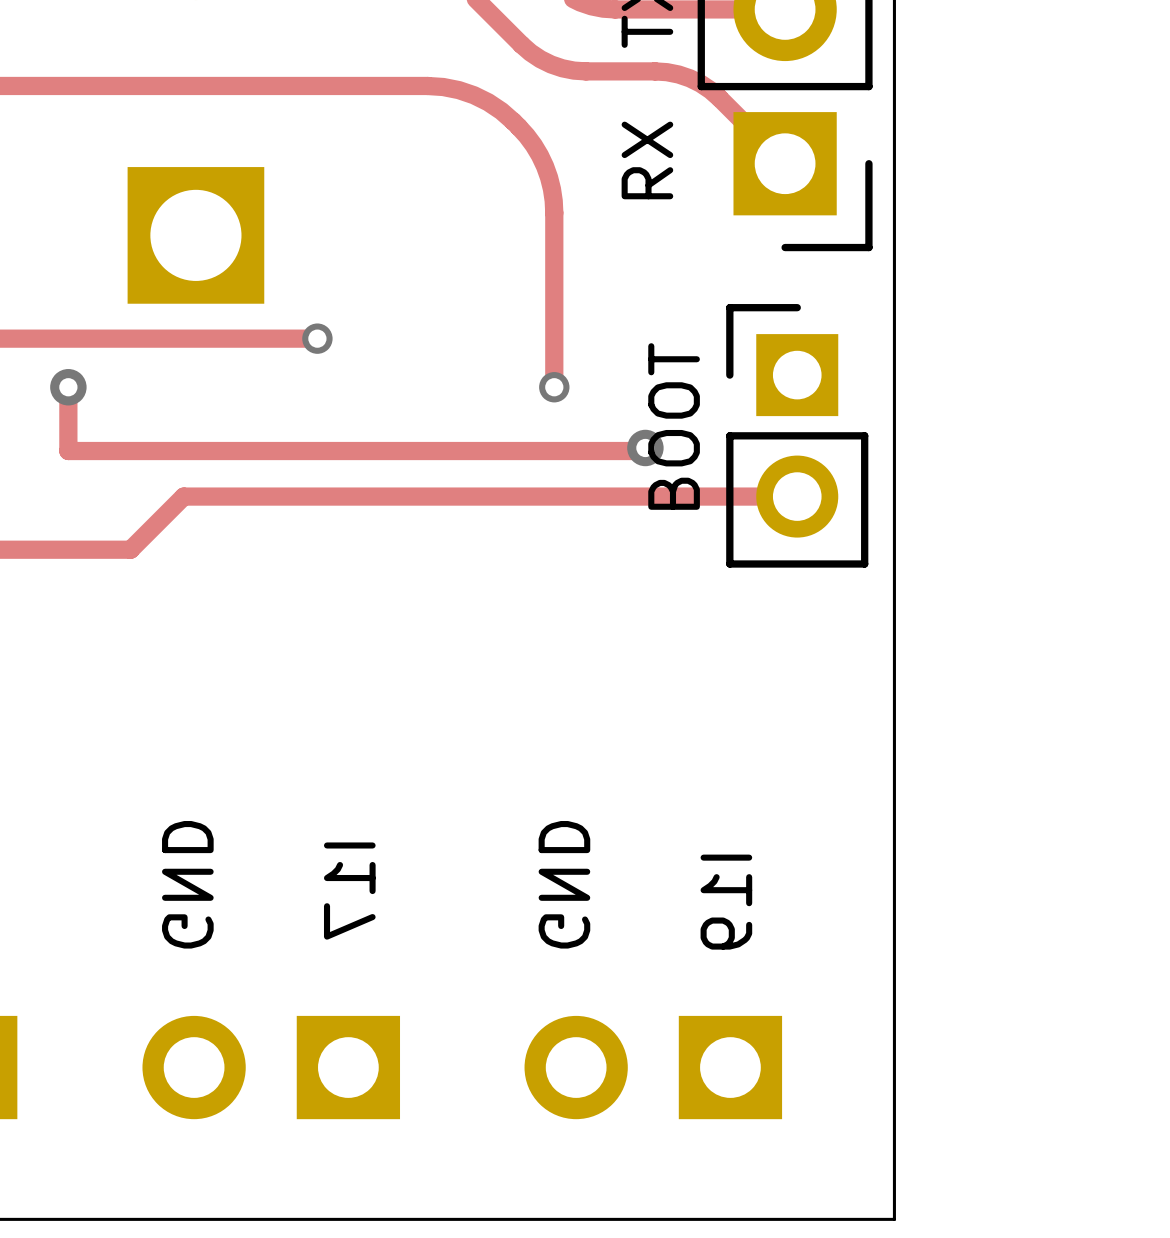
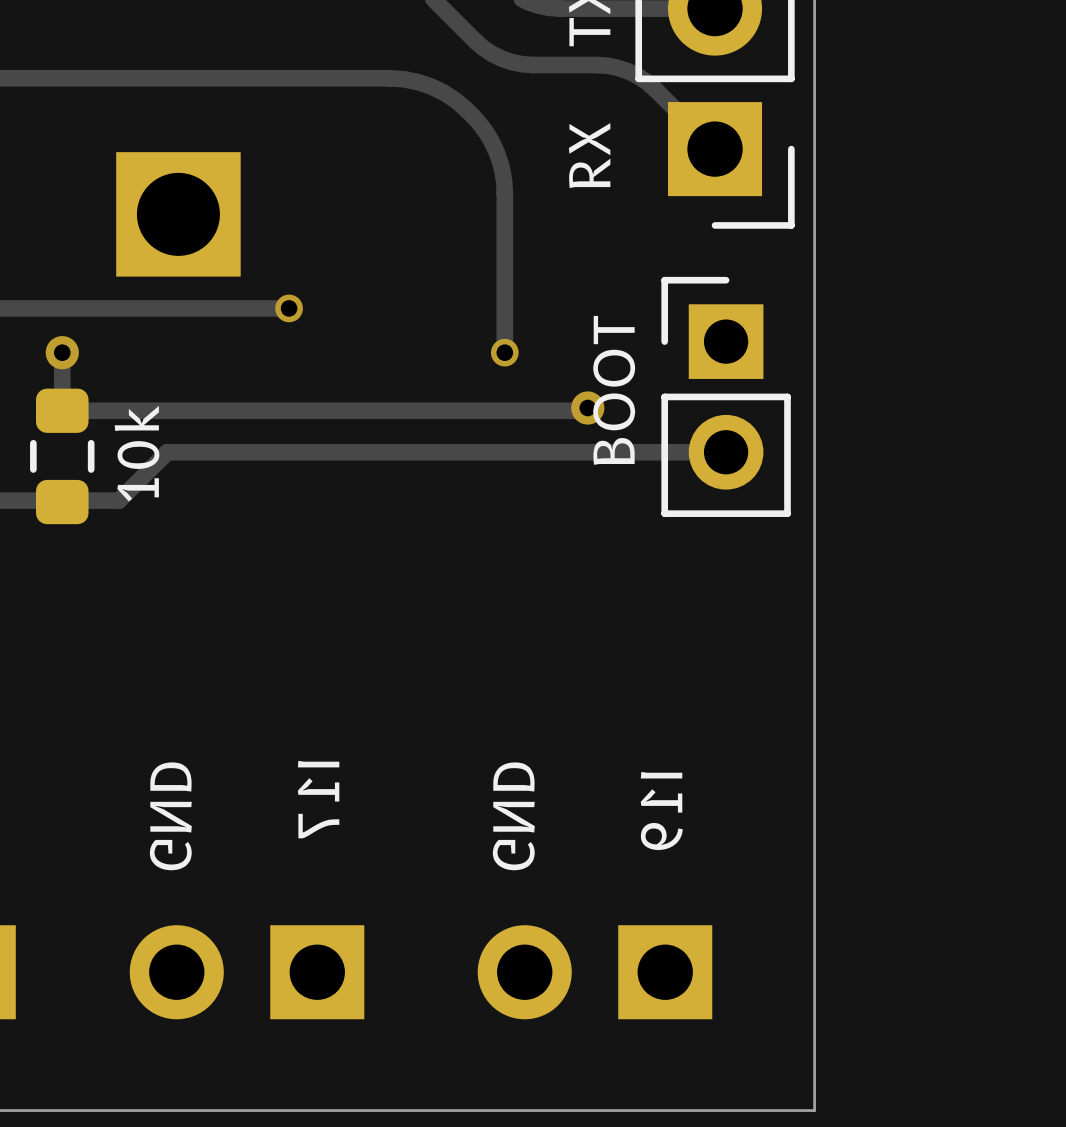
part: none -> 10k (62, 456)

